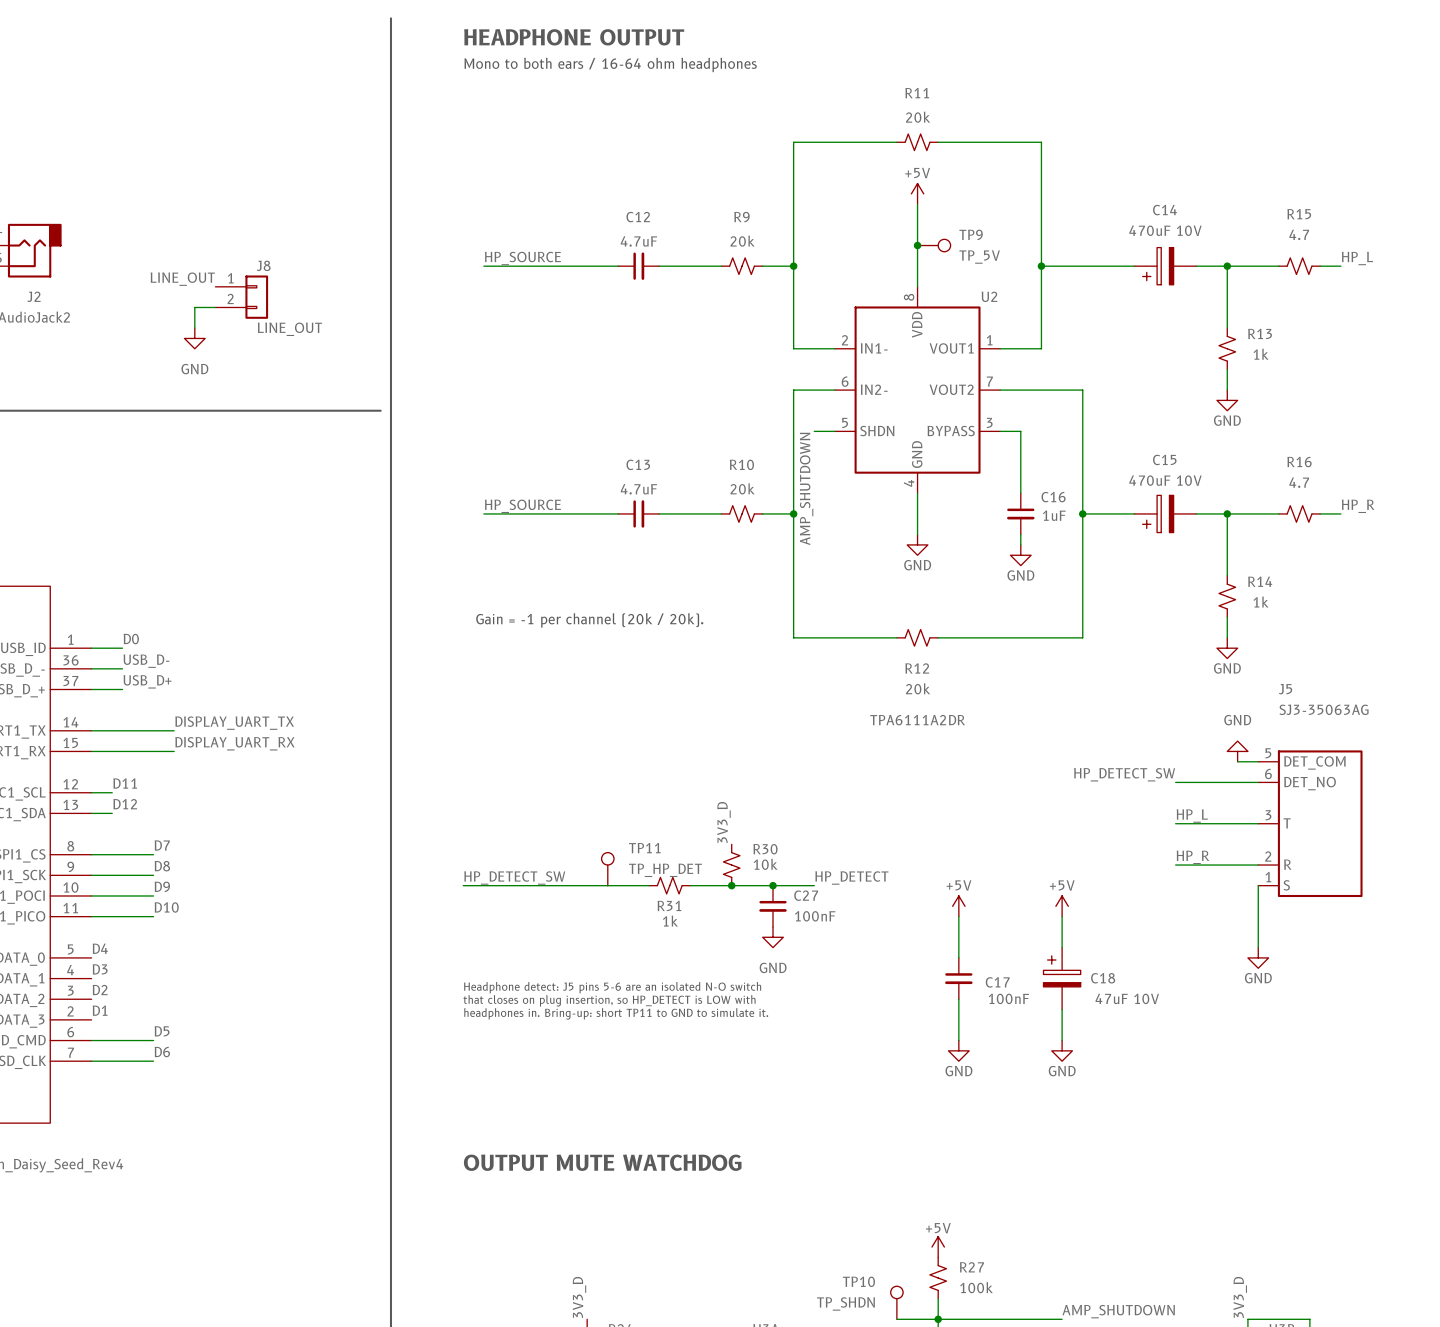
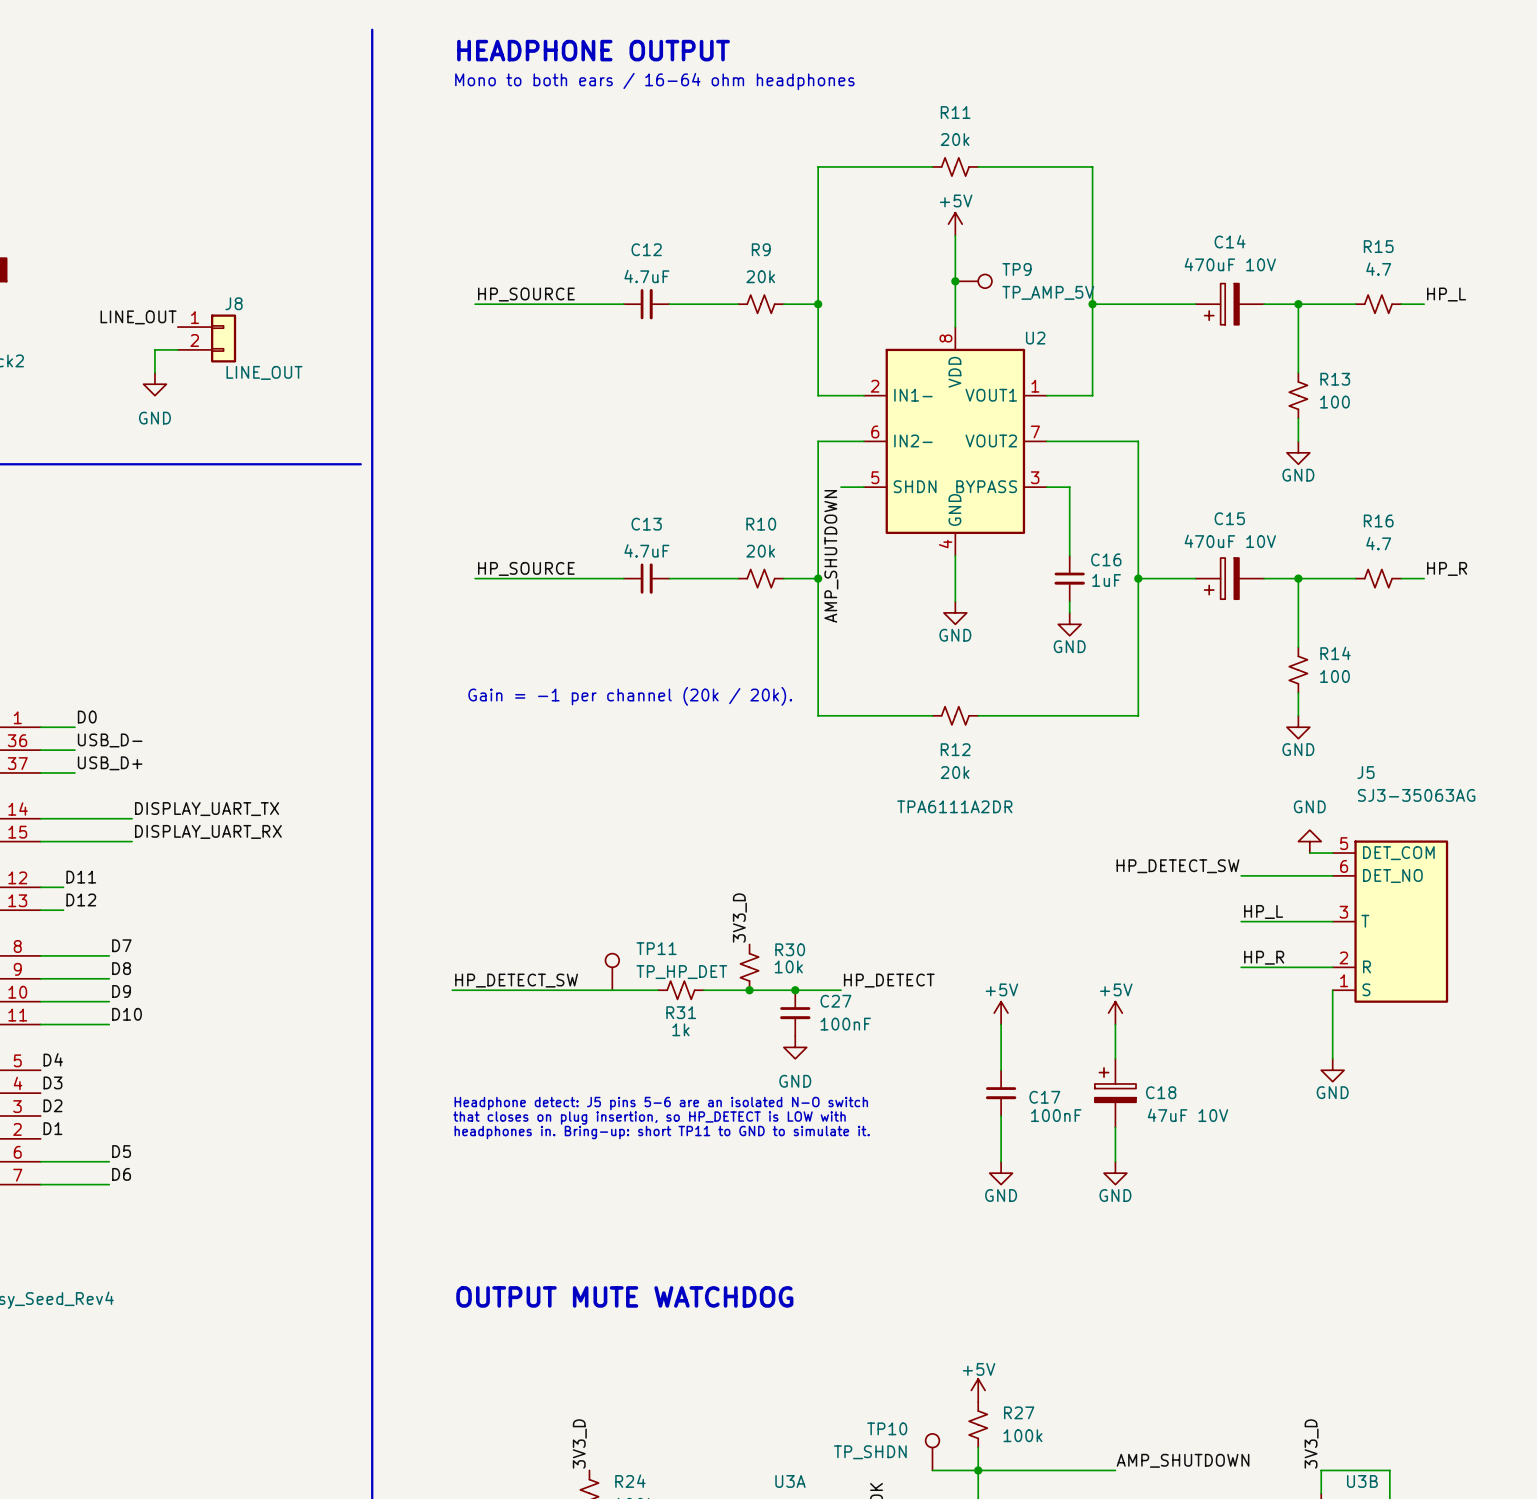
TP9 value: TP_5V (979, 257) -> TP_AMP_5V (1048, 292)
R13 value: 1k (1261, 354) -> 100 (1334, 402)
R14 value: 1k (1261, 602) -> 100 (1334, 676)

